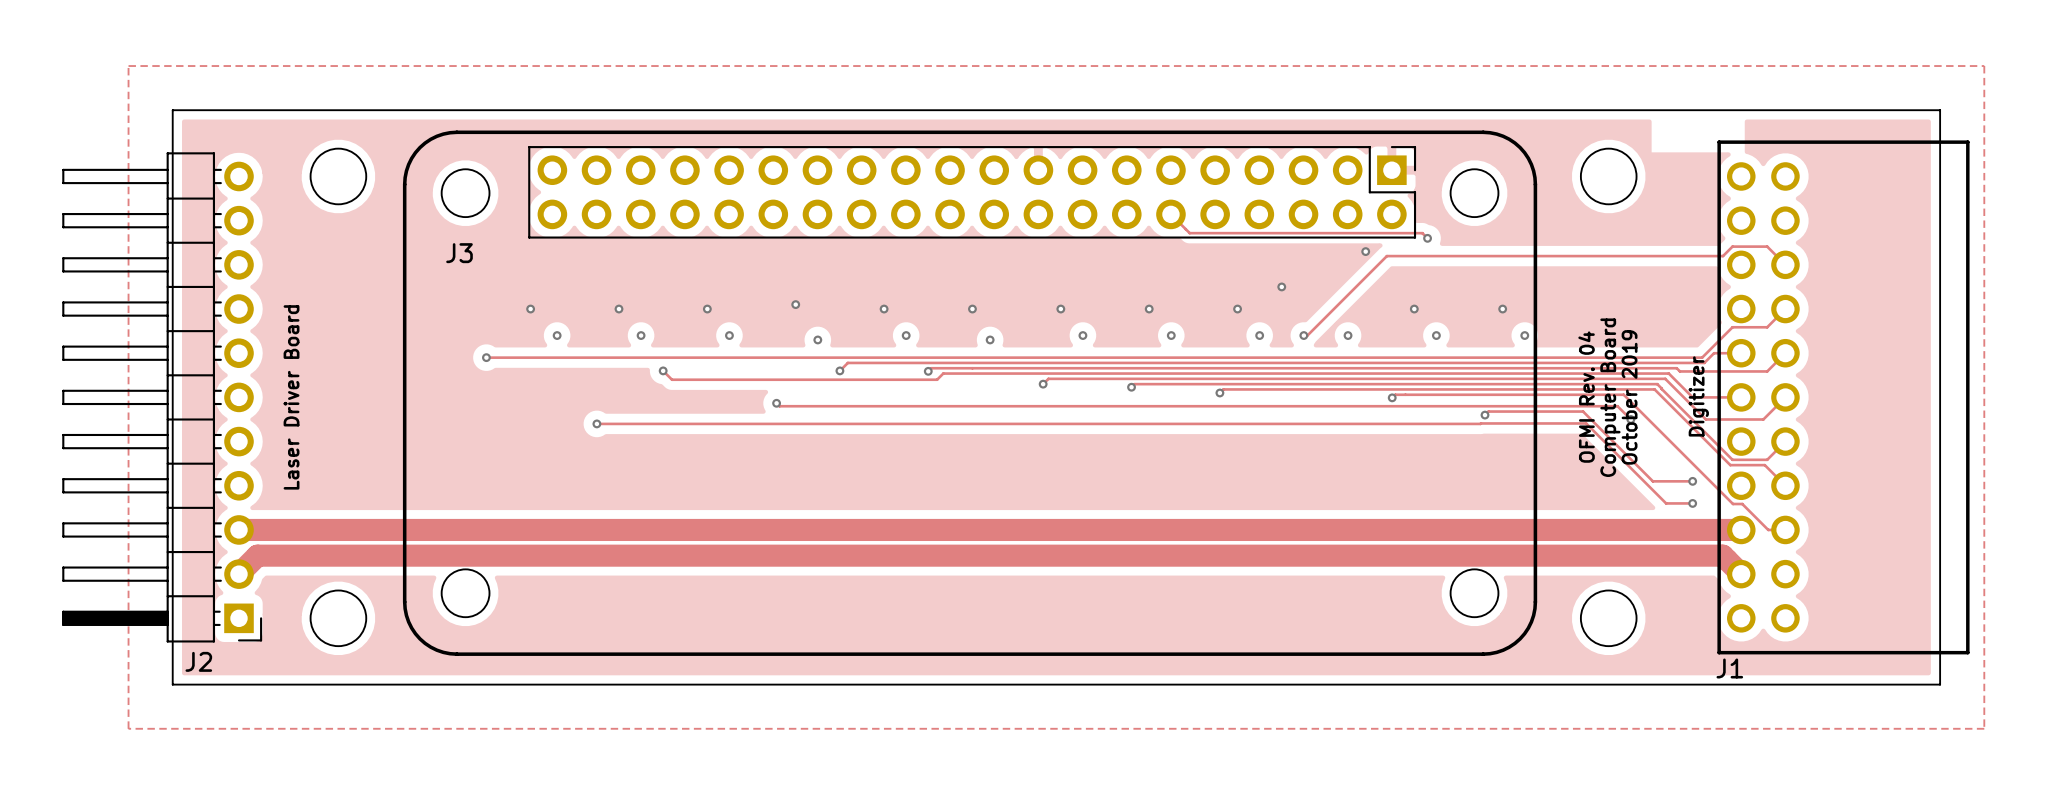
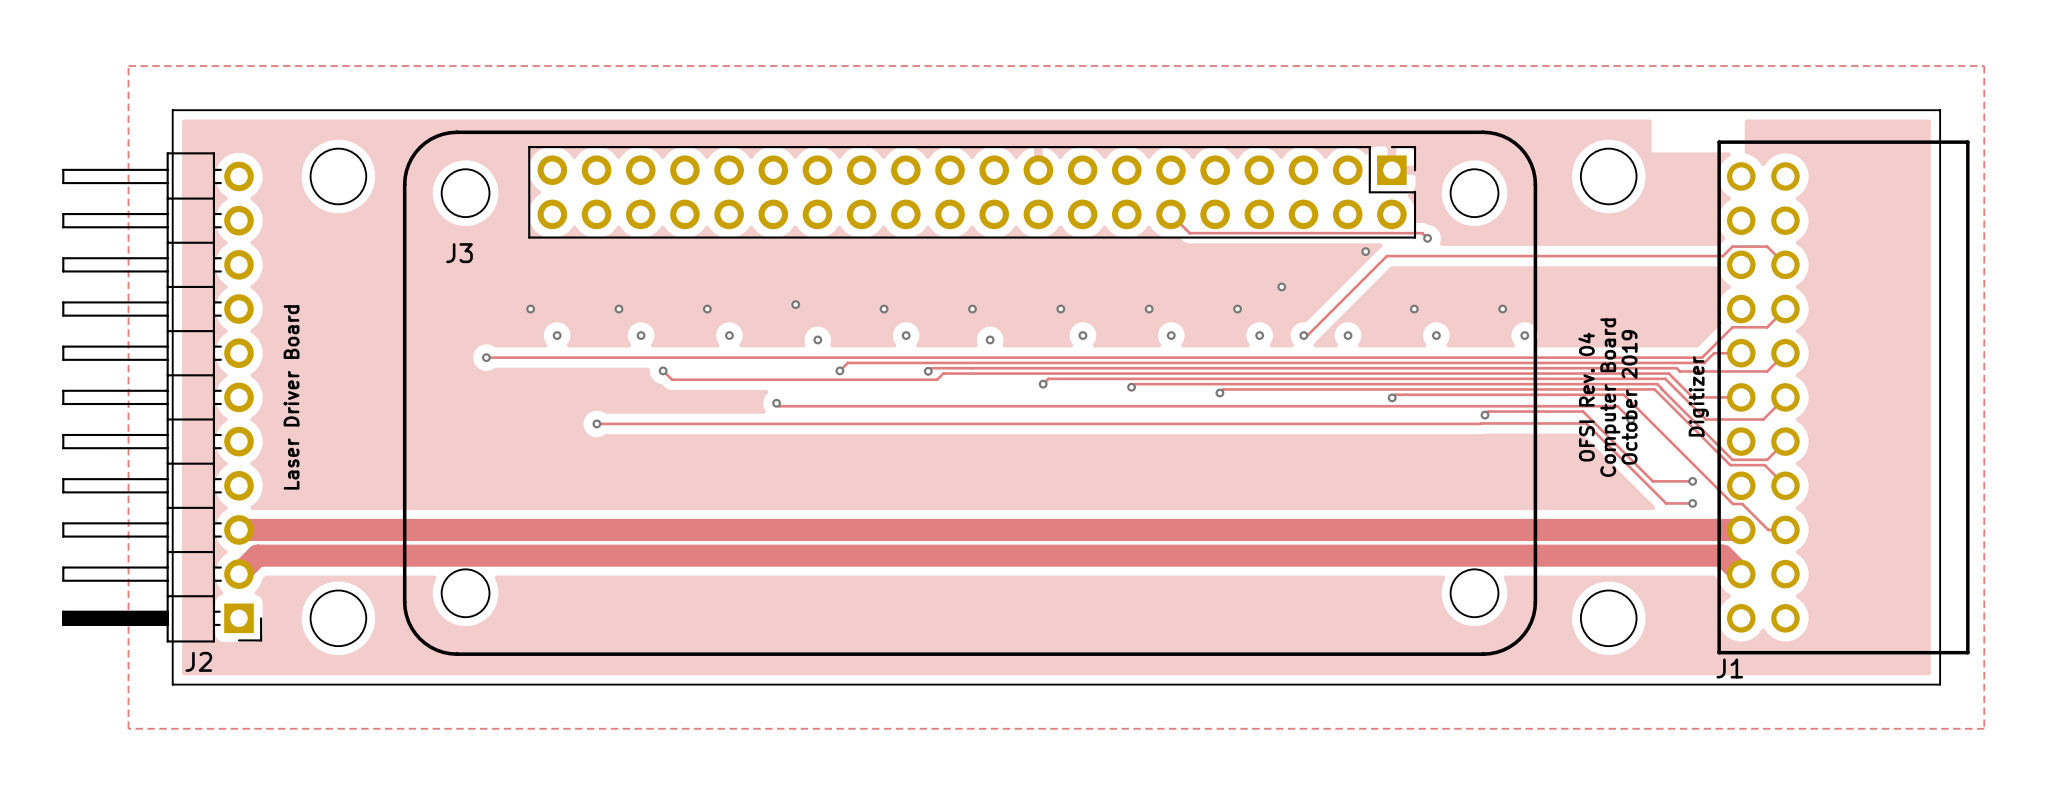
text: OFMI Rev. 04 (1586, 397) -> OFSI Rev. 04 (1586, 397)

